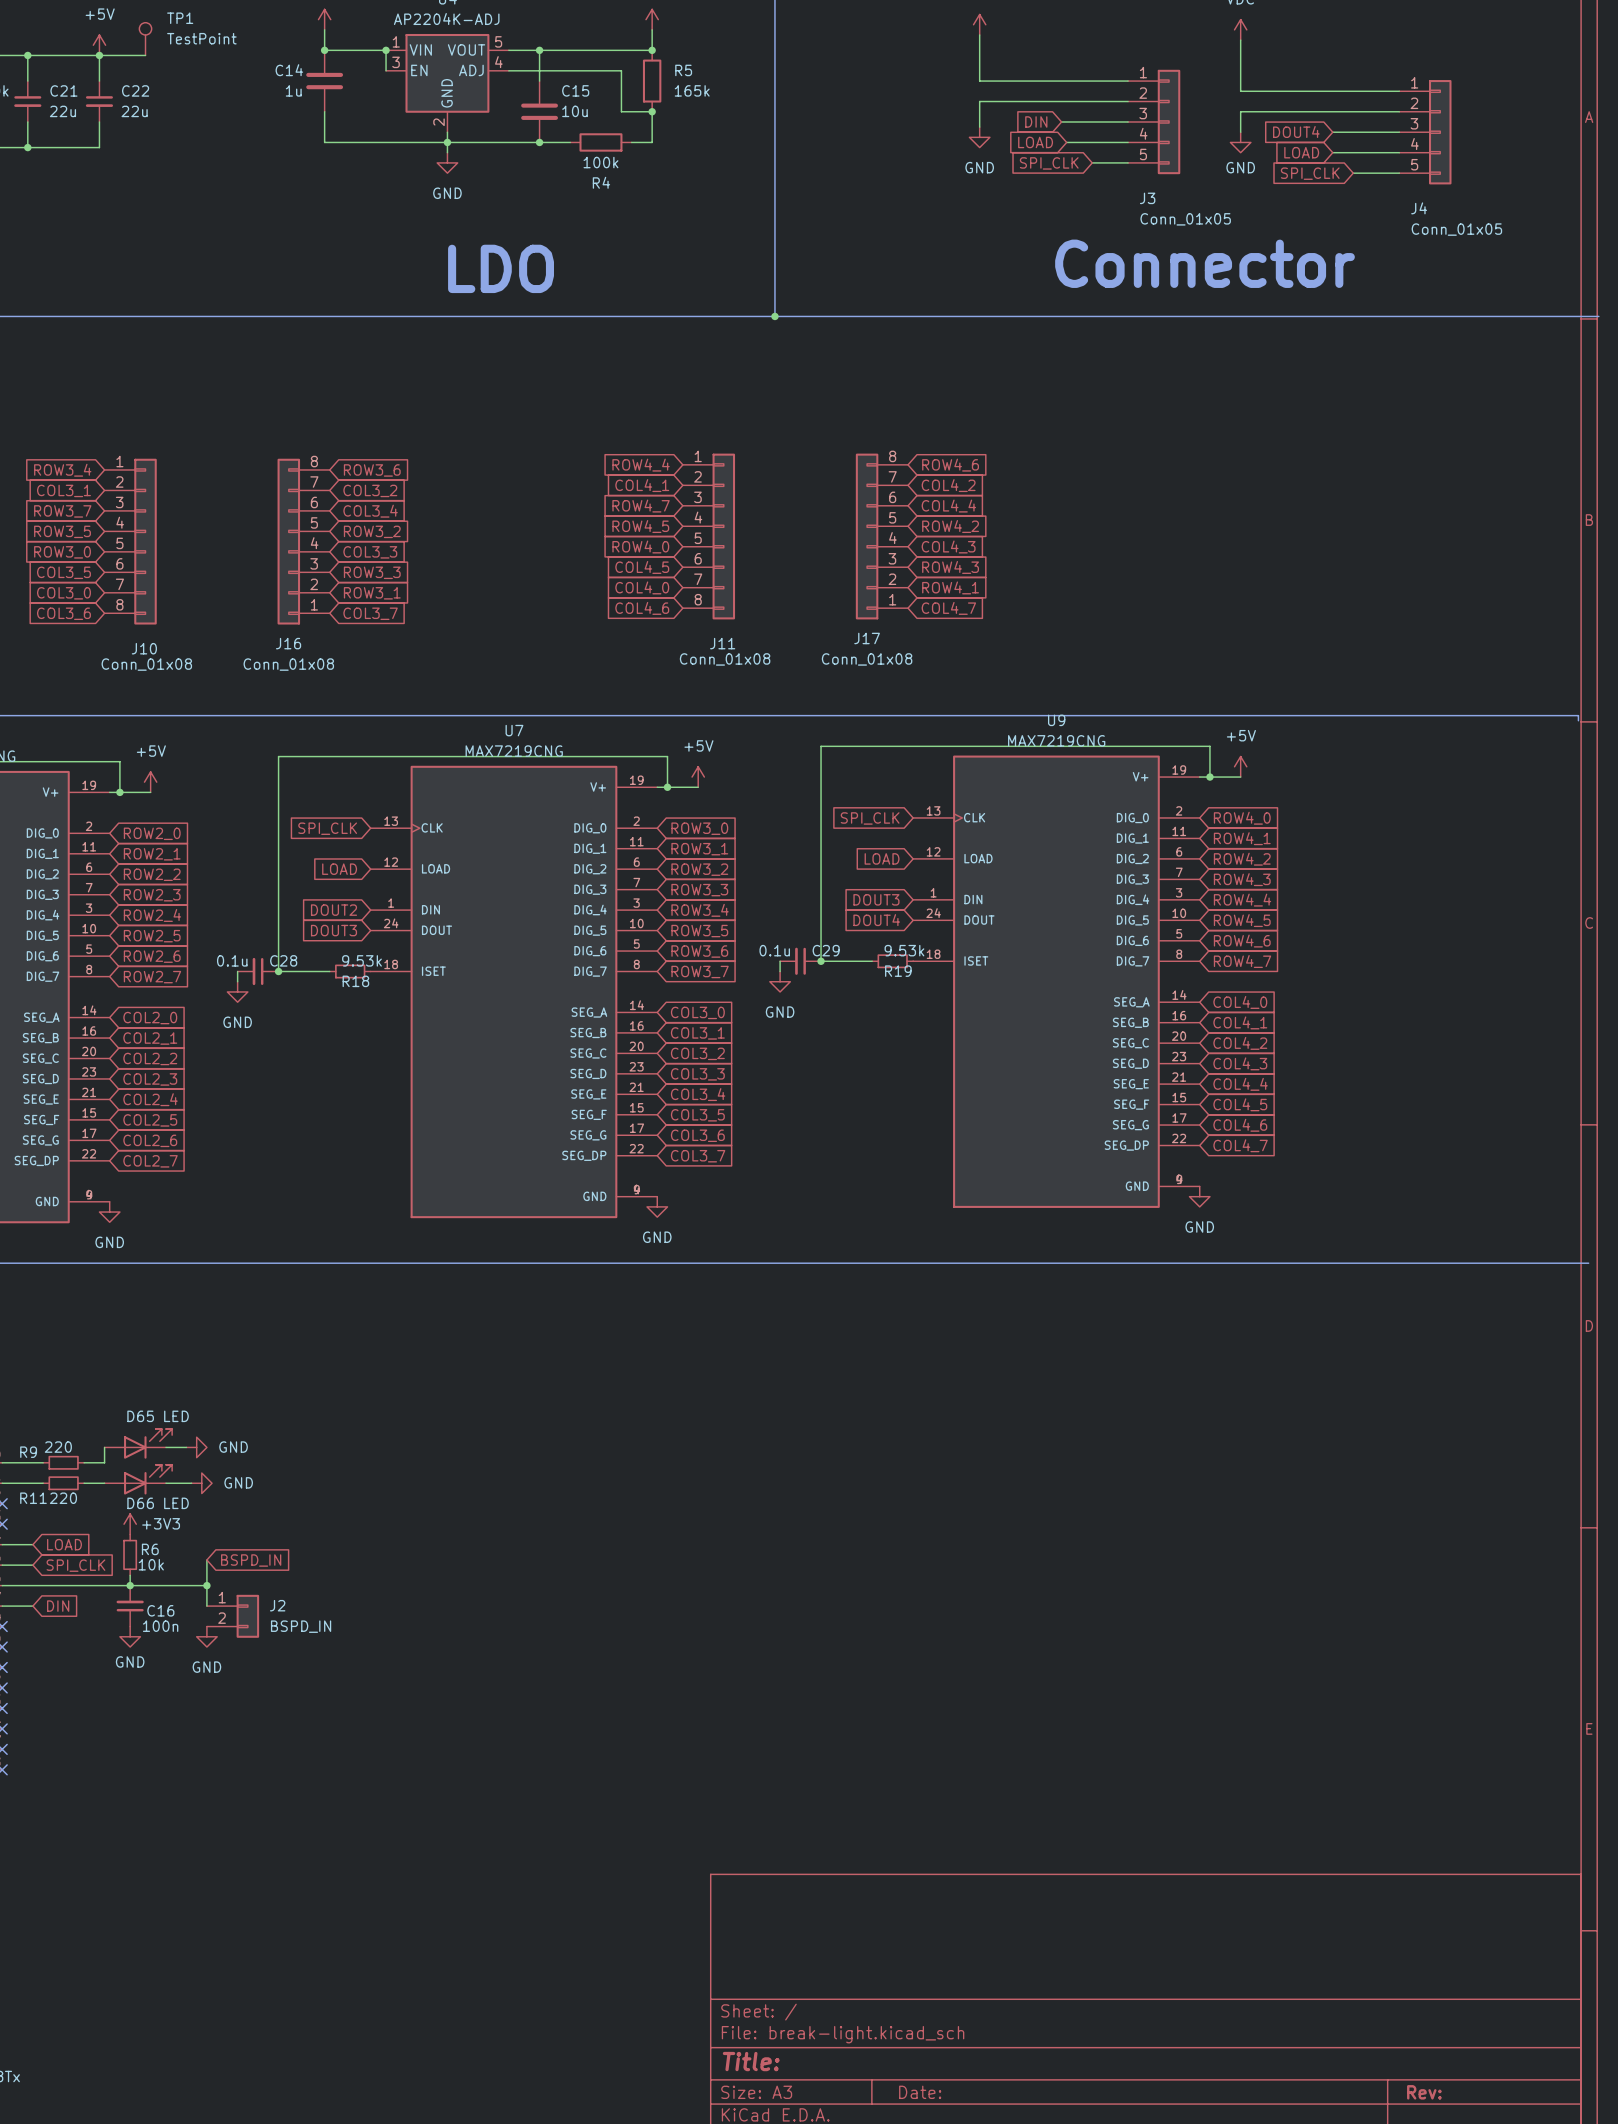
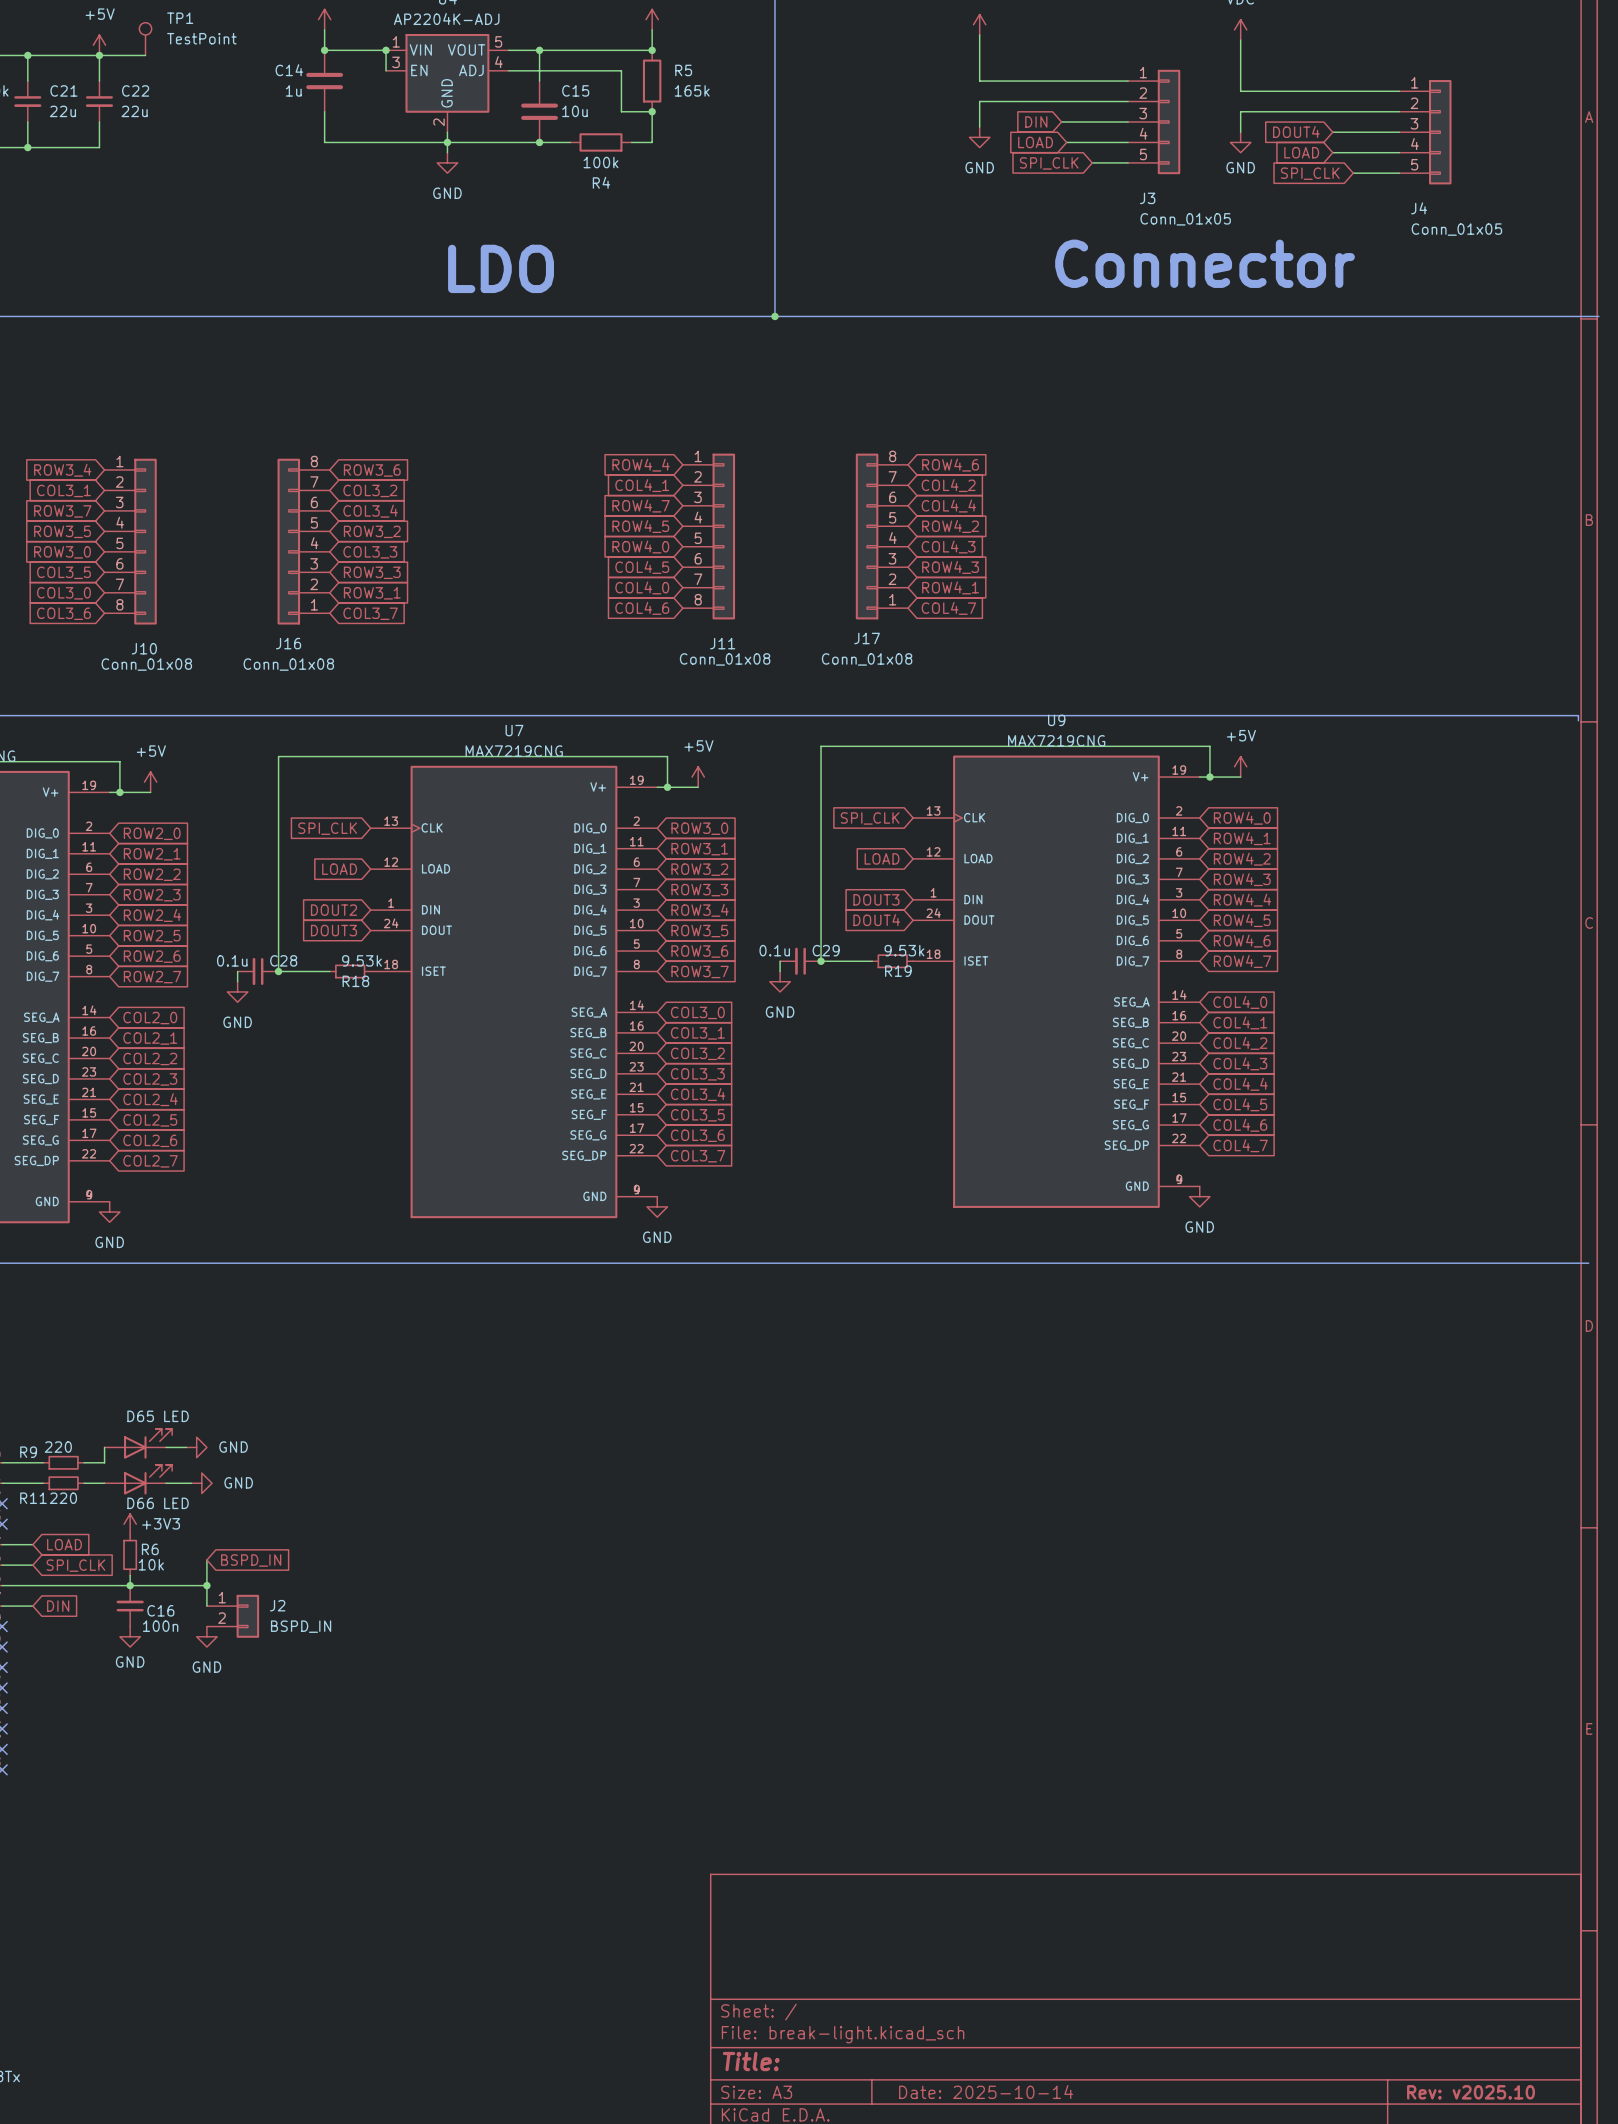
title block: Date: (920, 2092) -> Date: 2025-10-14 (986, 2092)
title block: Rev: (1424, 2092) -> Rev: v2025.10 (1471, 2092)

